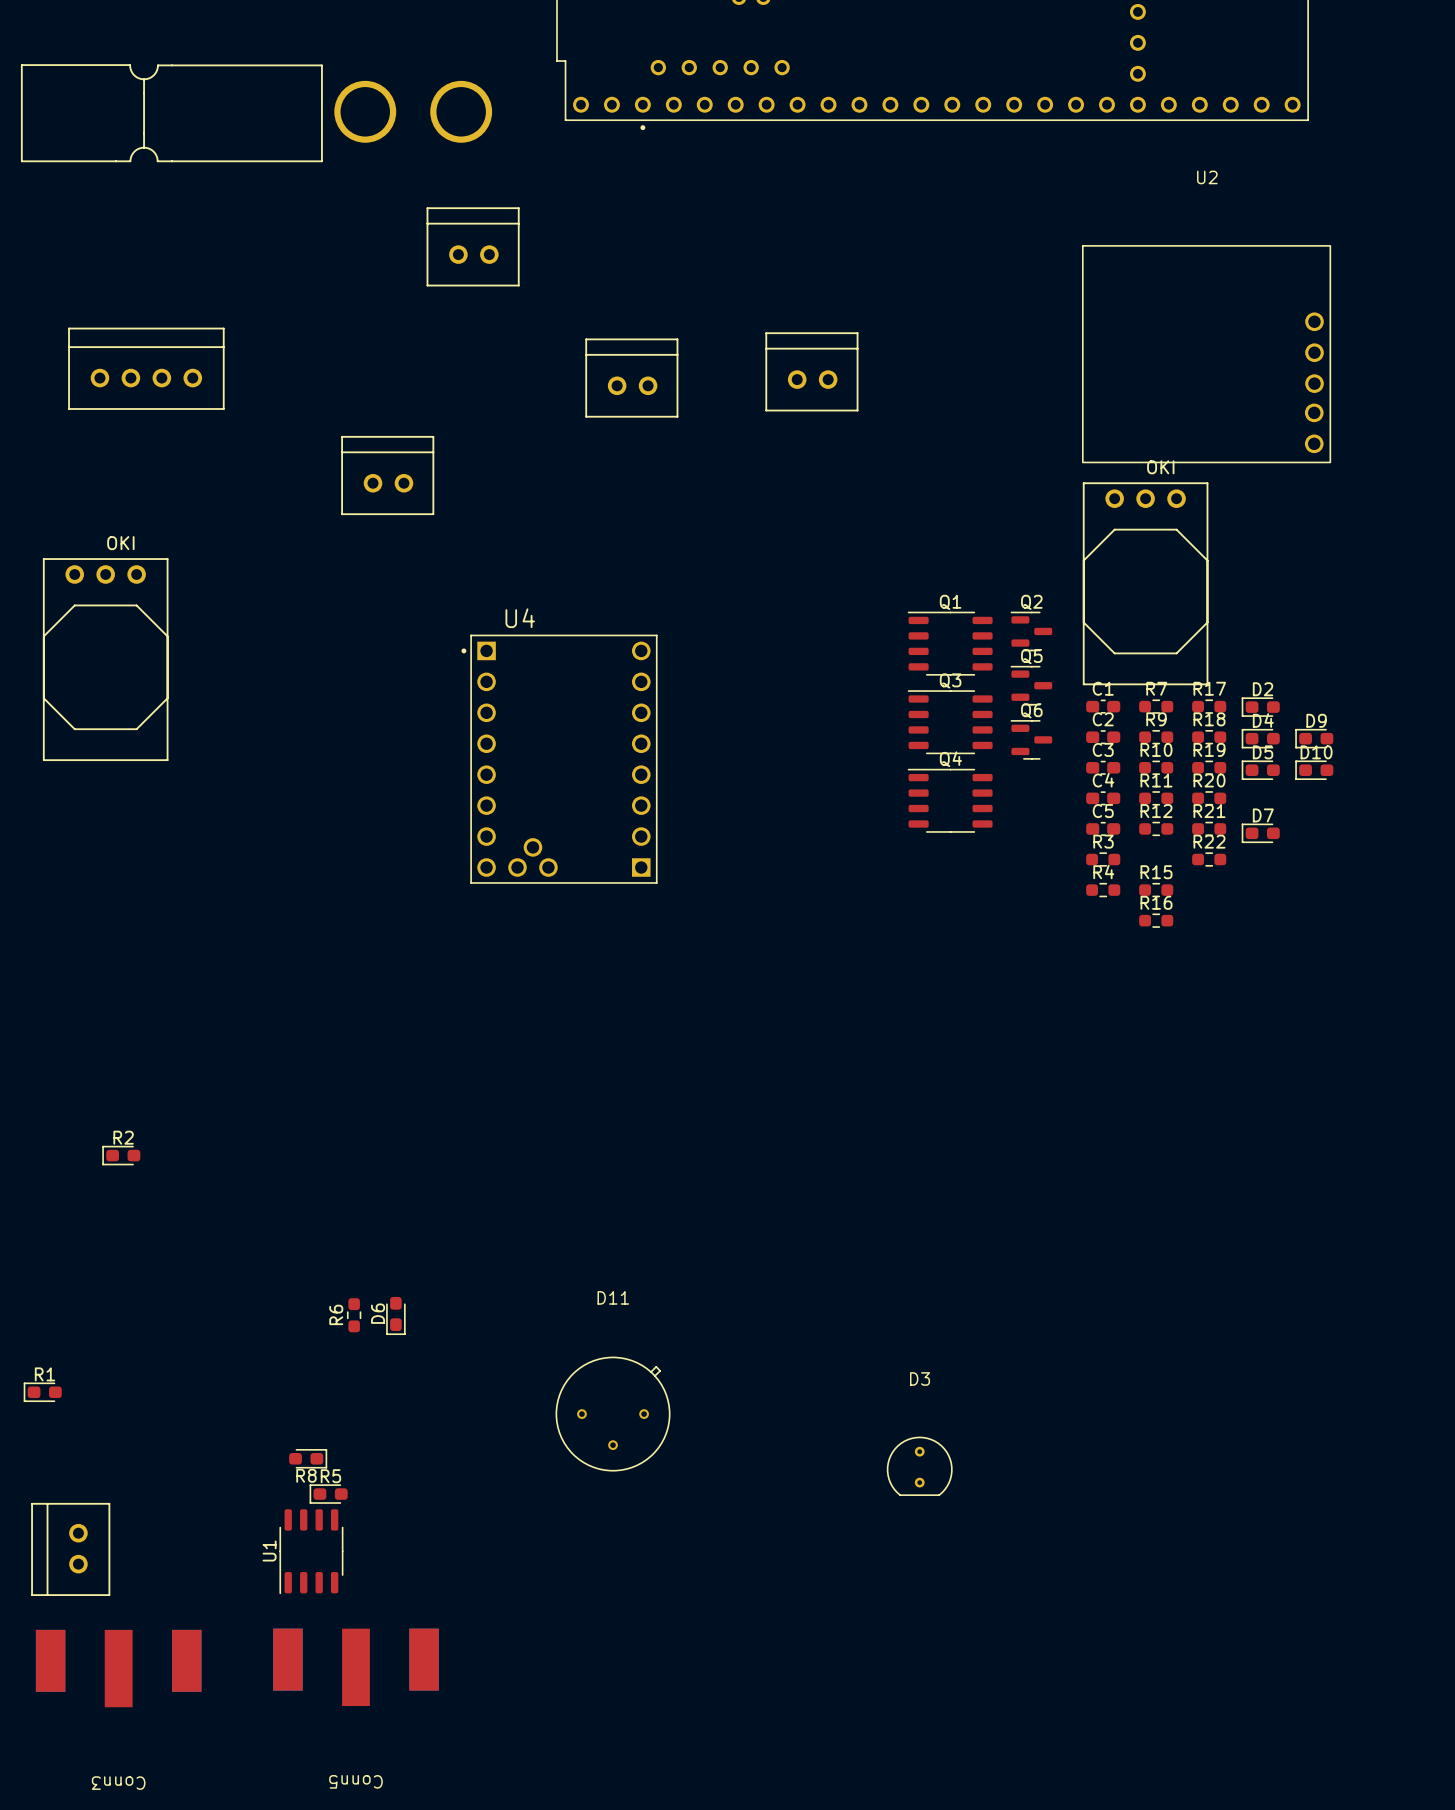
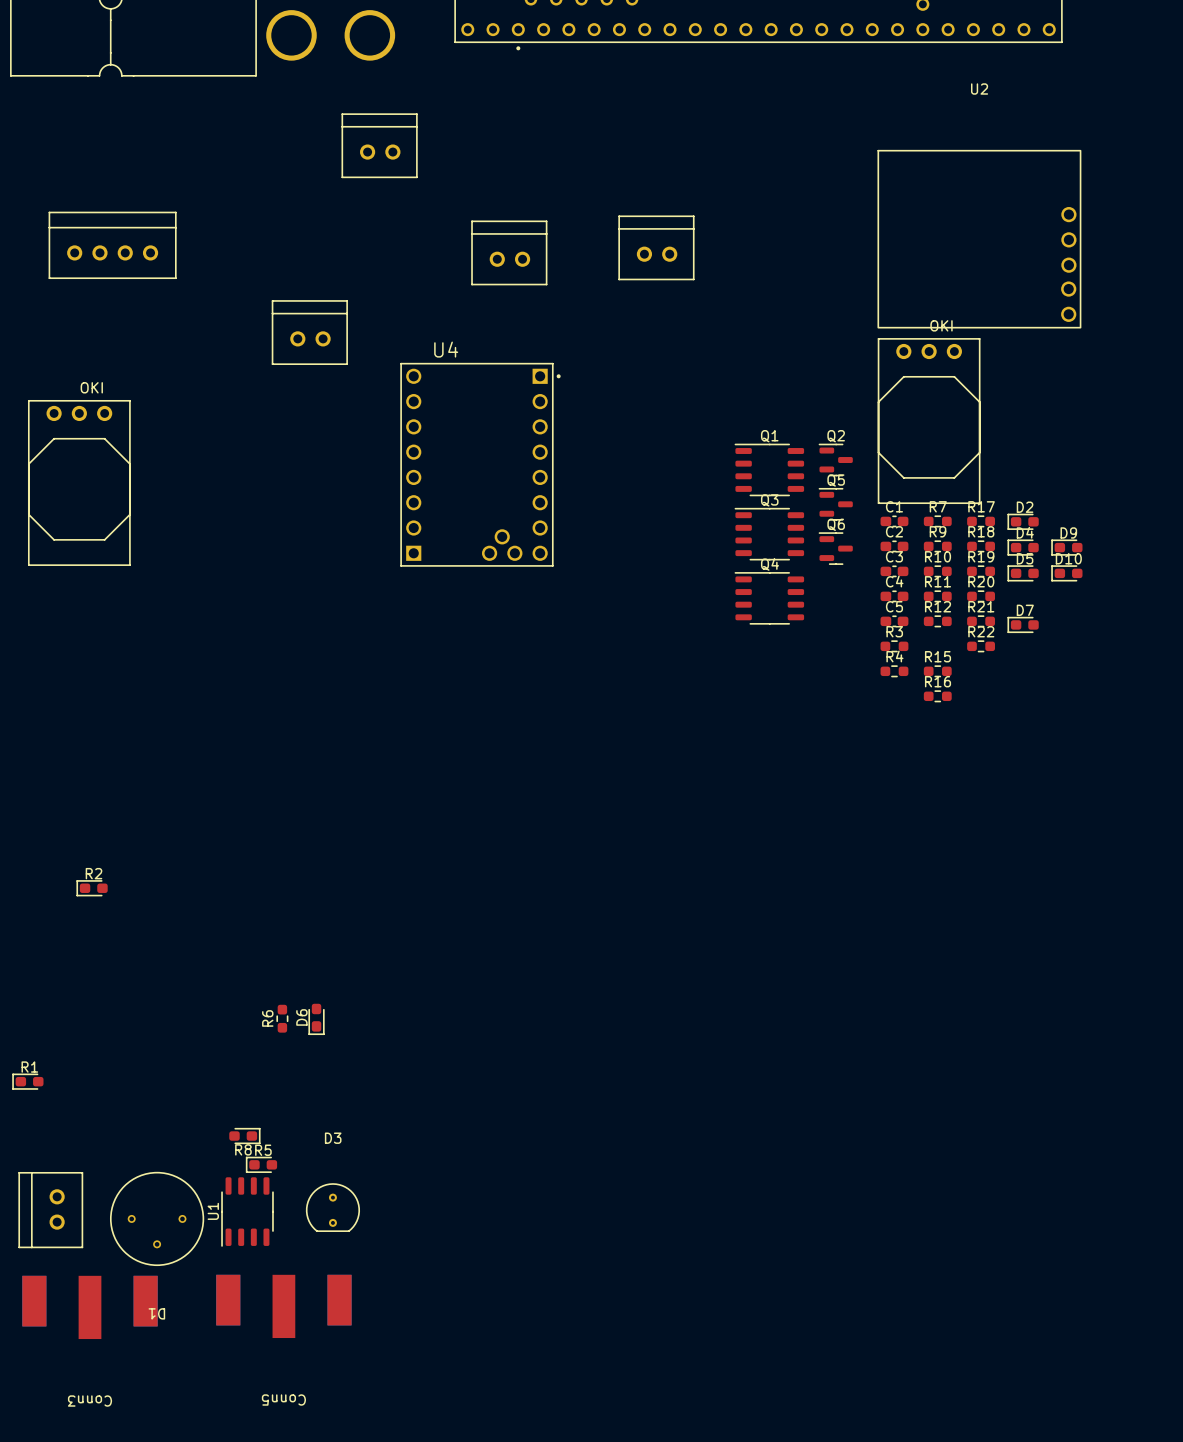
U2 footprint: [1082, 245, 1331, 464] -> [877, 150, 1082, 329]
U4 footprint: [461, 634, 658, 884] -> [400, 363, 561, 567]
D11: (613, 1414) -> none
D3 footprint: [887, 1436, 953, 1496] -> [306, 1183, 360, 1232]
D1: none -> (157, 1218)

